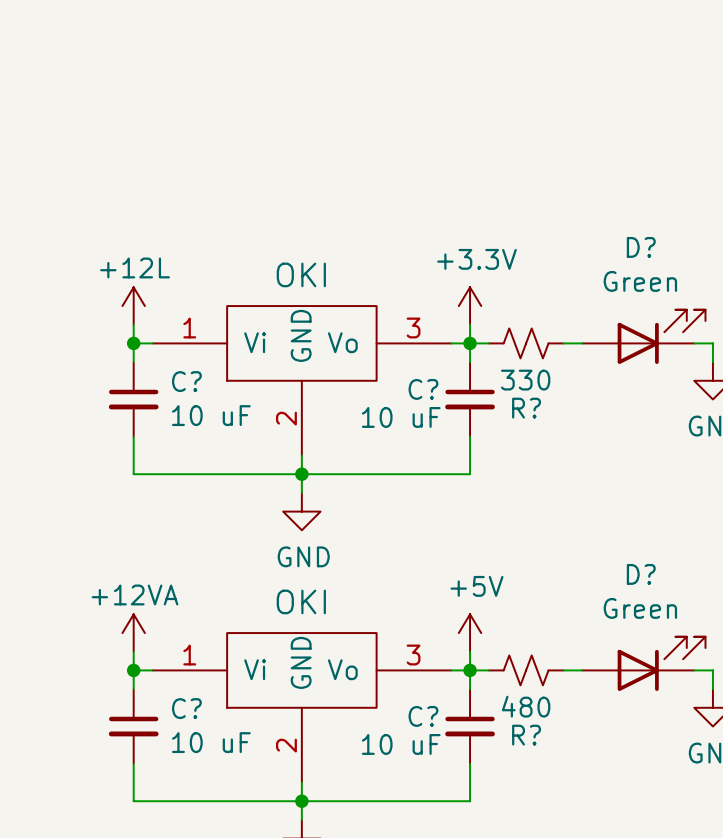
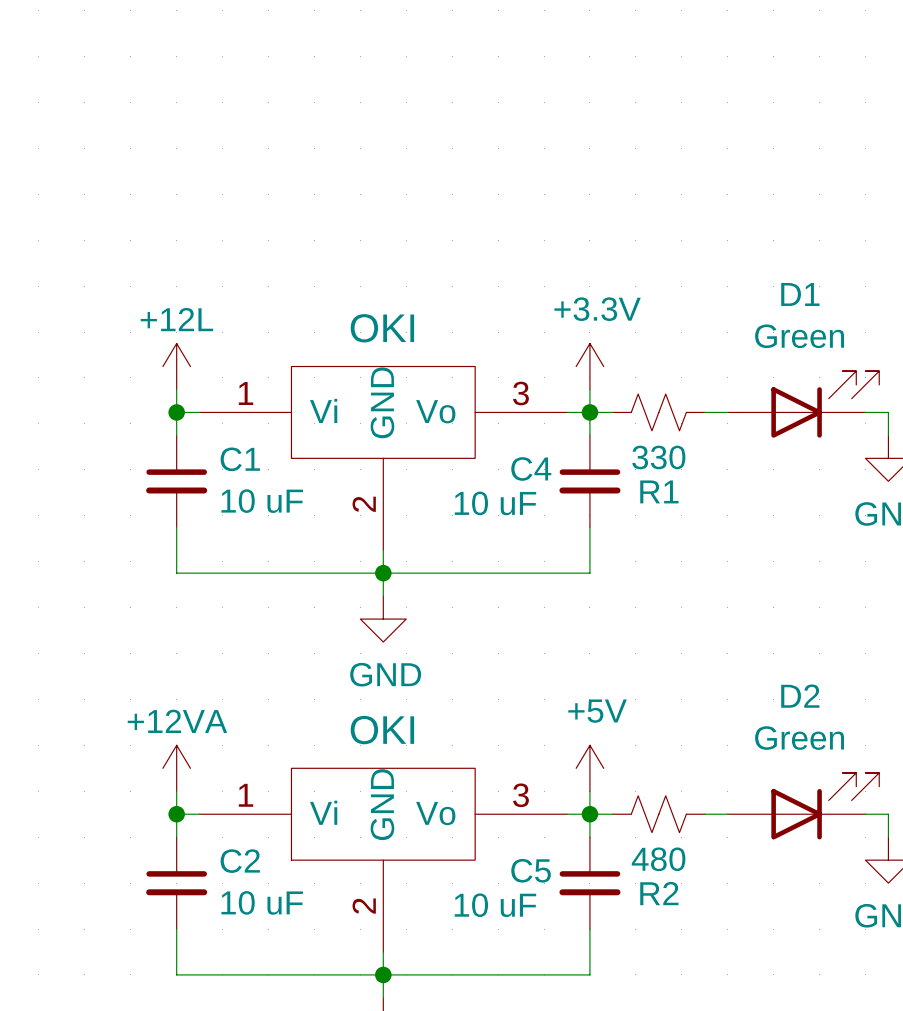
D? name: D? (641, 247) -> D1 (800, 294)
C? name: C? (186, 381) -> C1 (240, 459)
C? name: C? (423, 389) -> C4 (531, 468)
R? name: R? (526, 408) -> R1 (659, 491)
D? name: D? (641, 574) -> D2 (800, 696)
C? name: C? (186, 708) -> C2 (240, 861)
C? name: C? (423, 716) -> C5 (531, 870)
R? name: R? (526, 735) -> R2 (659, 893)

